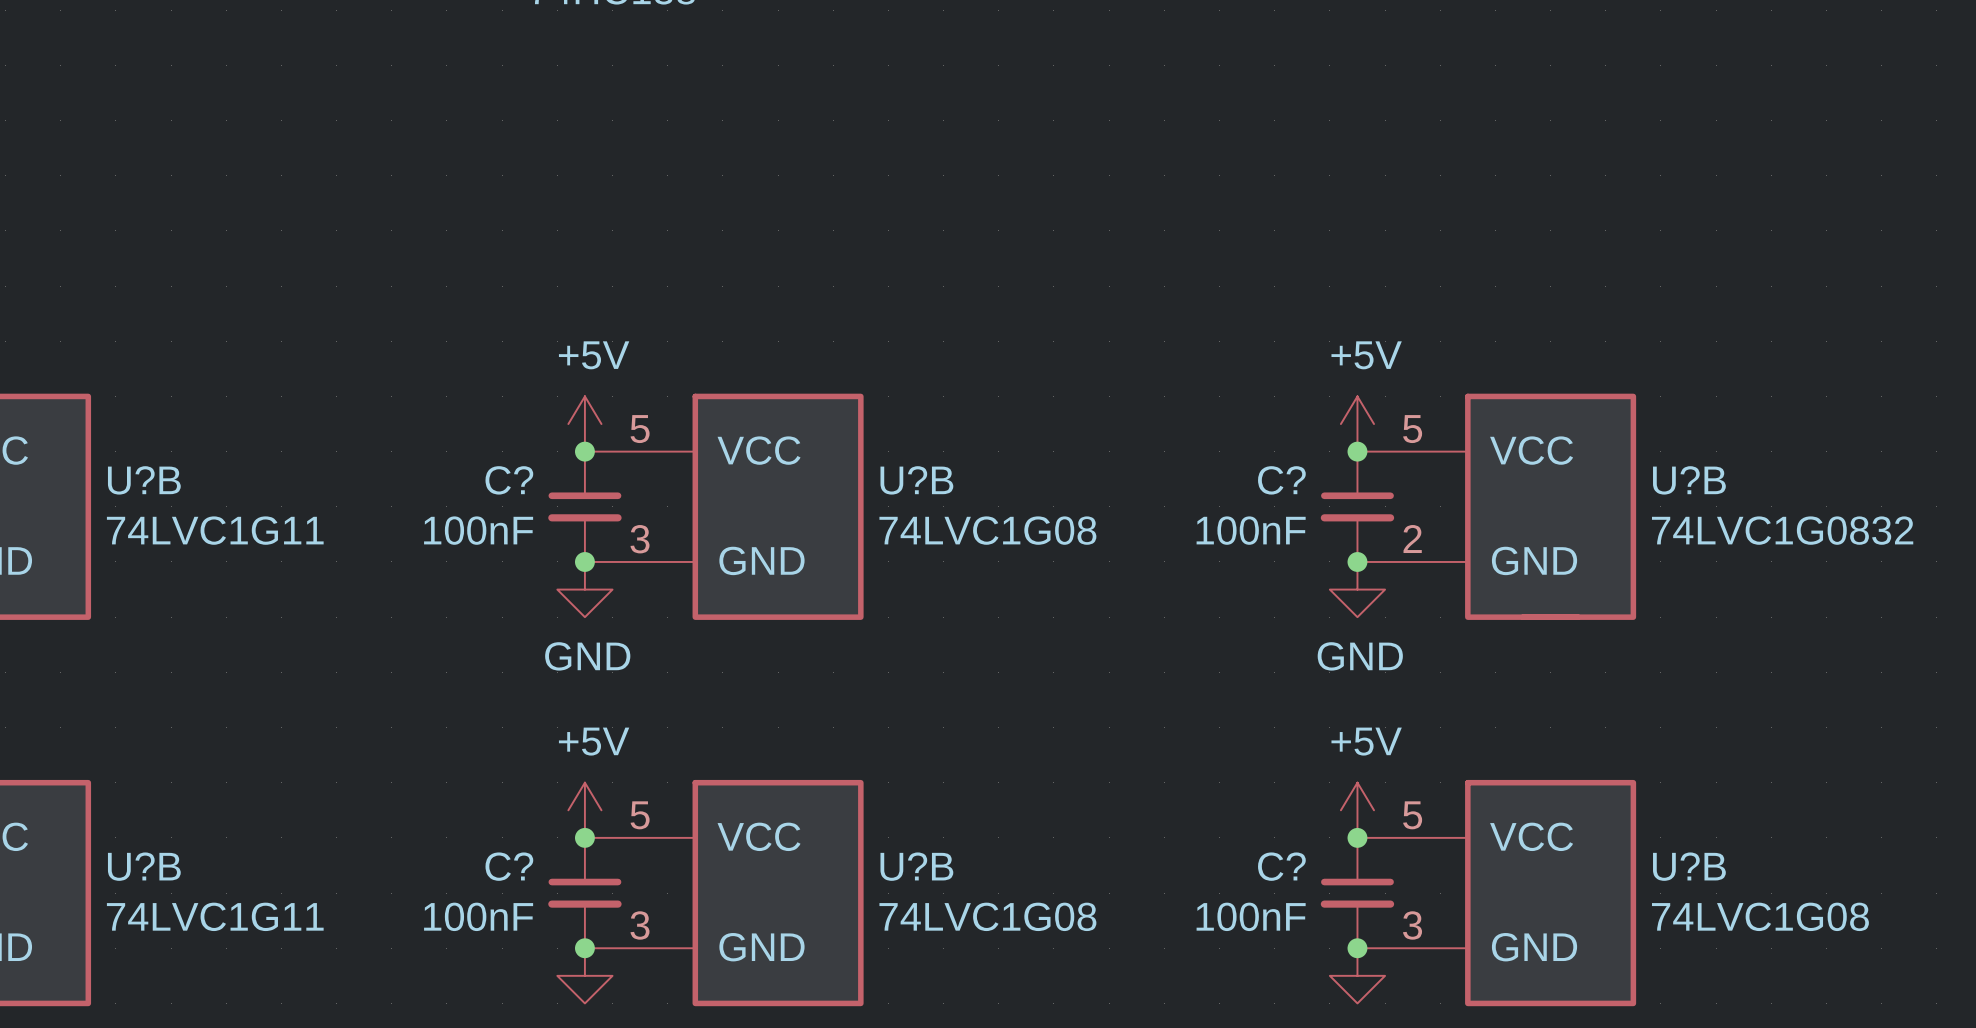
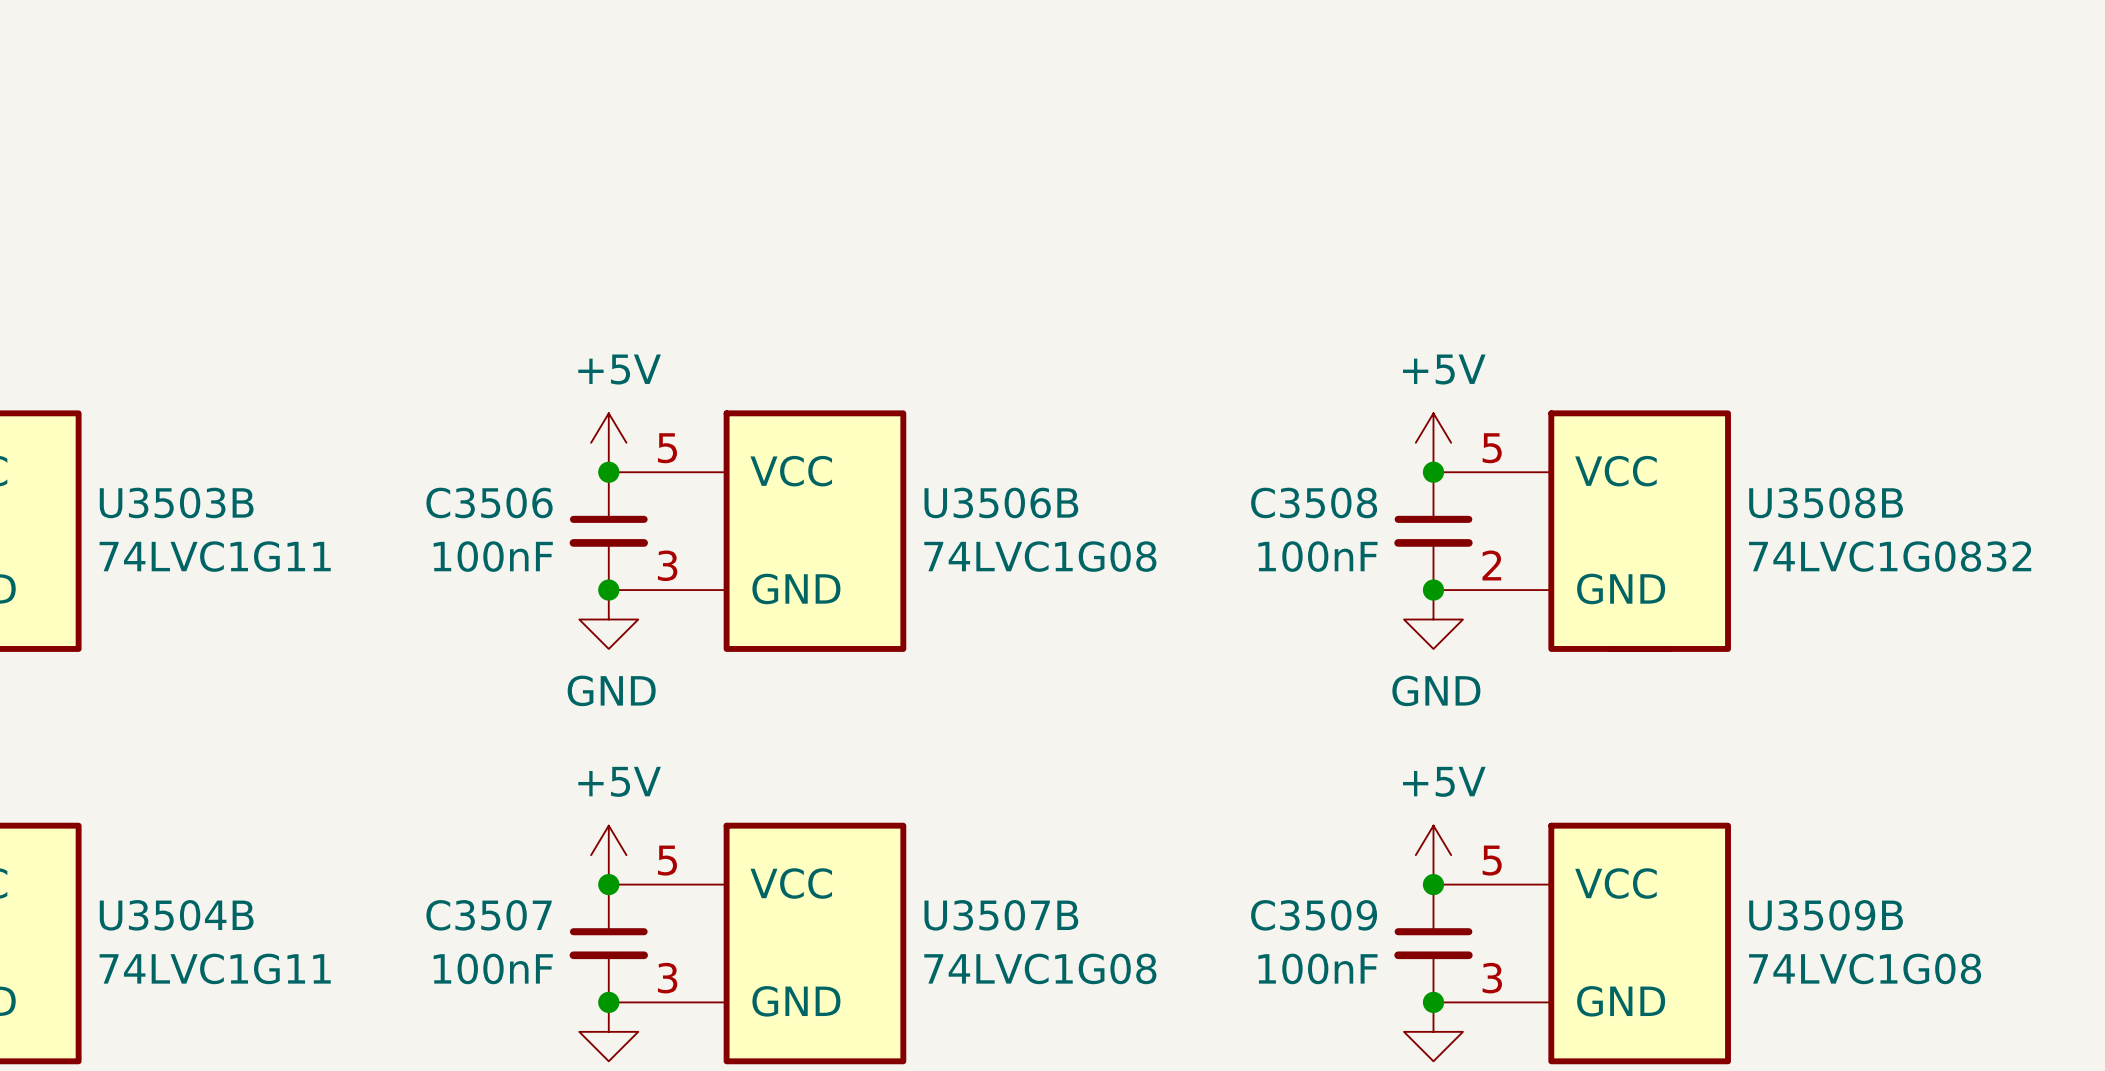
U?B name: U?B (144, 480) -> U3503B (176, 502)
C? name: C? (509, 480) -> C3506 (489, 502)
U?B name: U?B (916, 480) -> U3506B (1001, 502)
C? name: C? (1281, 480) -> C3508 (1314, 502)
U?B name: U?B (1689, 480) -> U3508B (1826, 502)
U?B name: U?B (144, 866) -> U3504B (176, 915)
C? name: C? (509, 866) -> C3507 (489, 915)
U?B name: U?B (916, 866) -> U3507B (1001, 915)
C? name: C? (1281, 866) -> C3509 (1314, 915)
U?B name: U?B (1689, 866) -> U3509B (1826, 915)

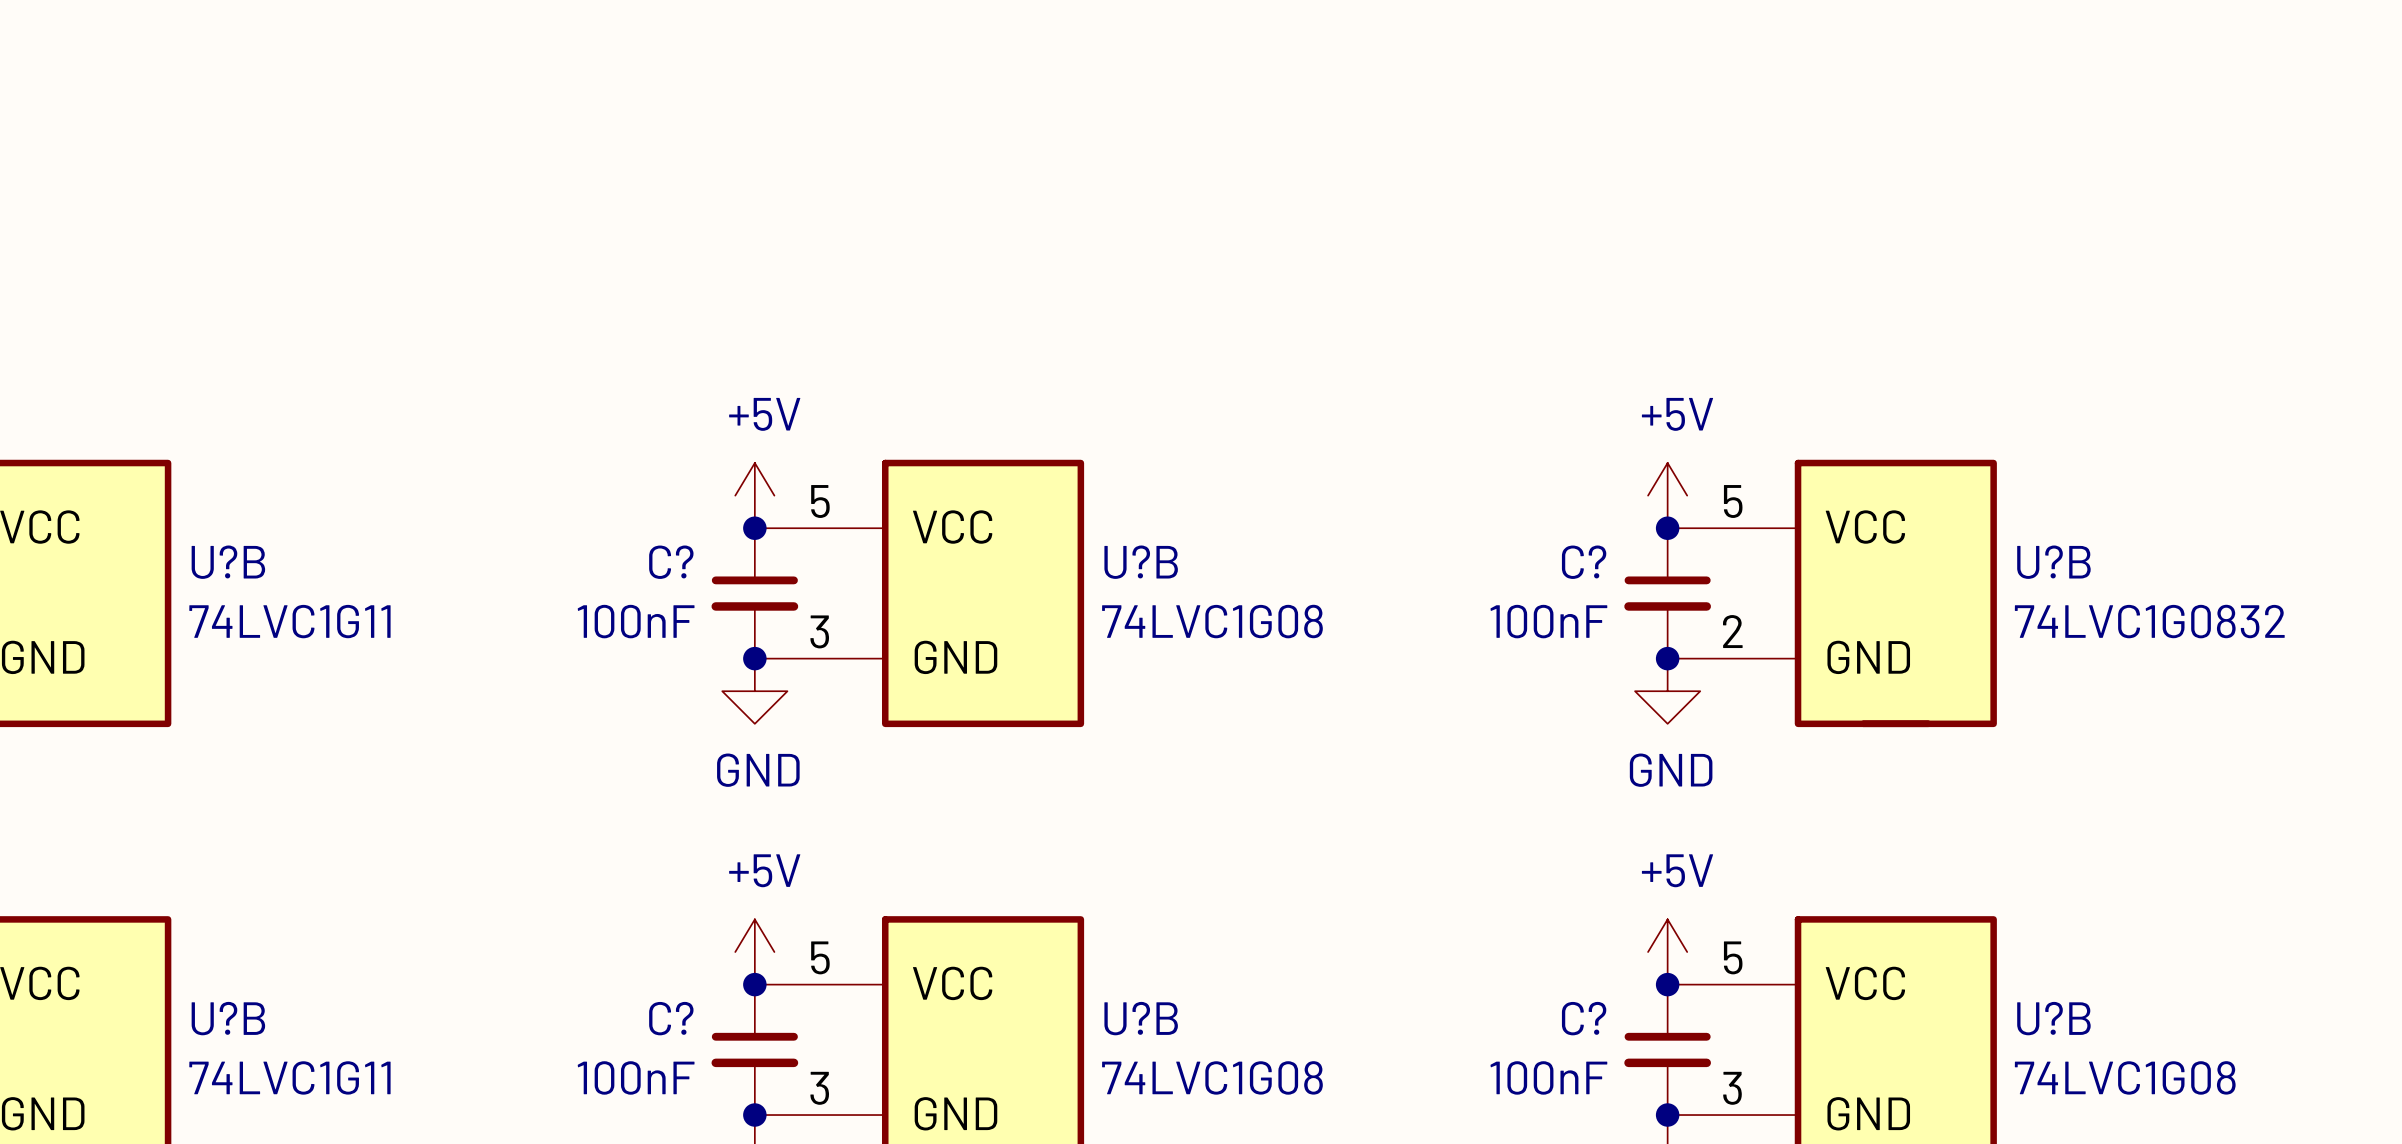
U3503B name: U3503B (176, 502) -> U?B (228, 562)
C3506 name: C3506 (489, 502) -> C? (671, 562)
U3506B name: U3506B (1001, 502) -> U?B (1141, 562)
C3508 name: C3508 (1314, 502) -> C? (1584, 562)
U3508B name: U3508B (1826, 502) -> U?B (2053, 562)
U3504B name: U3504B (176, 915) -> U?B (228, 1018)
C3507 name: C3507 (489, 915) -> C? (671, 1018)
U3507B name: U3507B (1001, 915) -> U?B (1141, 1018)
C3509 name: C3509 (1314, 915) -> C? (1584, 1018)
U3509B name: U3509B (1826, 915) -> U?B (2053, 1018)

